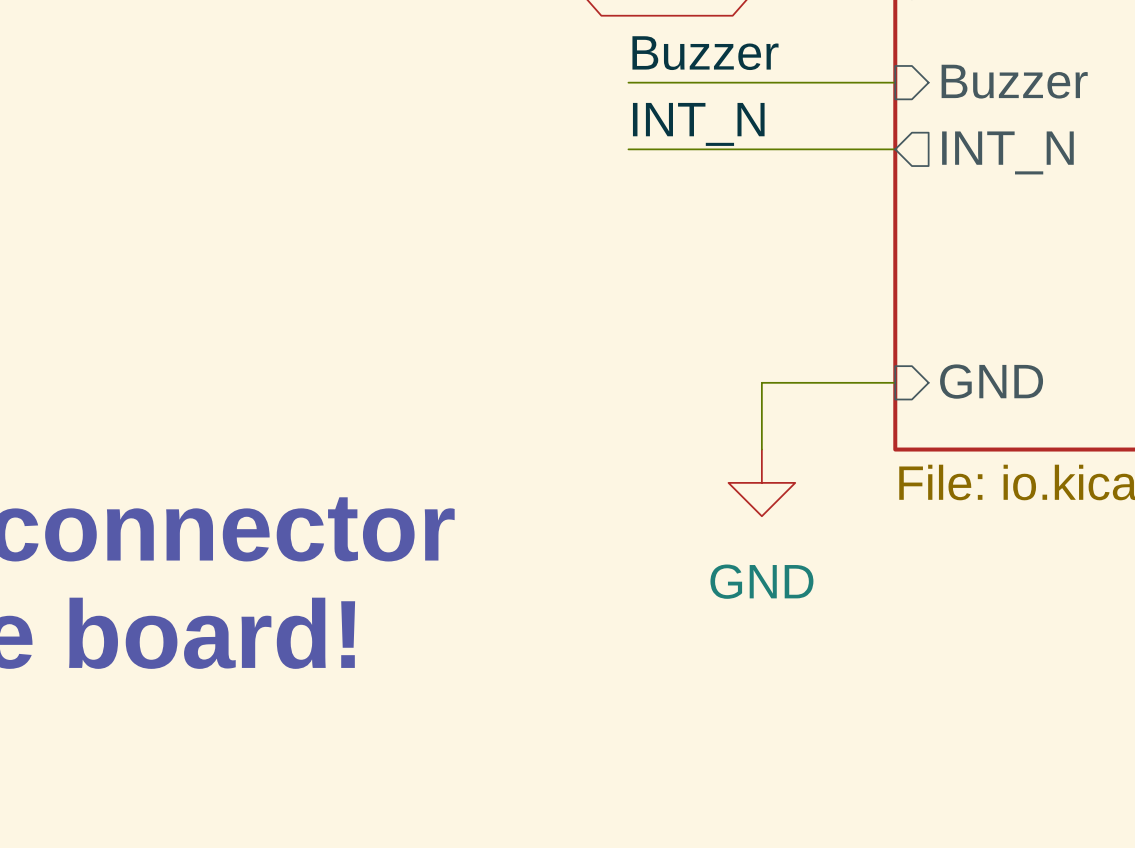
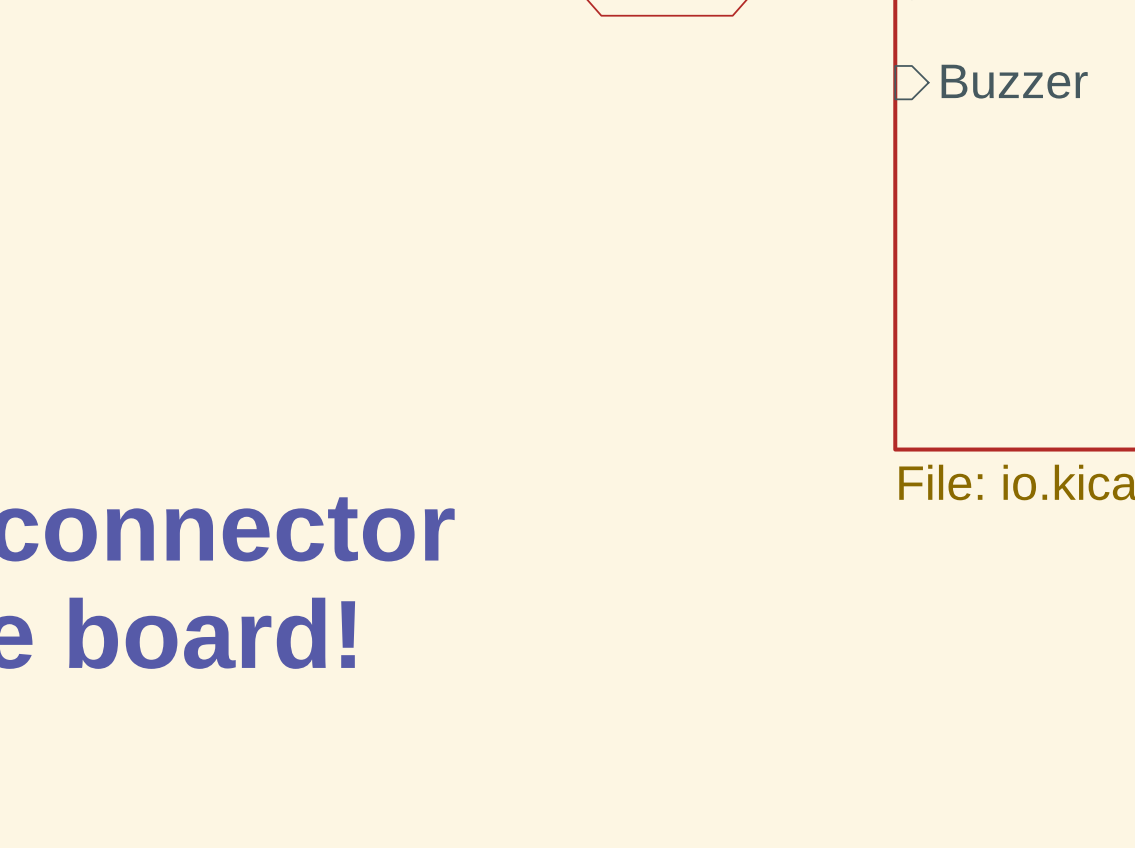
label: Buzzer (705, 53) -> none
wire: (628, 82) (895, 82) -> none
label: INT_N (698, 124) -> none
wire: (628, 149) (895, 149) -> none
sheet pin: INT_N (1007, 152) -> none
sheet pin: GND (991, 381) -> none
wire: (895, 382) (761, 382) (761, 449) -> none
power symbol: GND (761, 482) -> none

